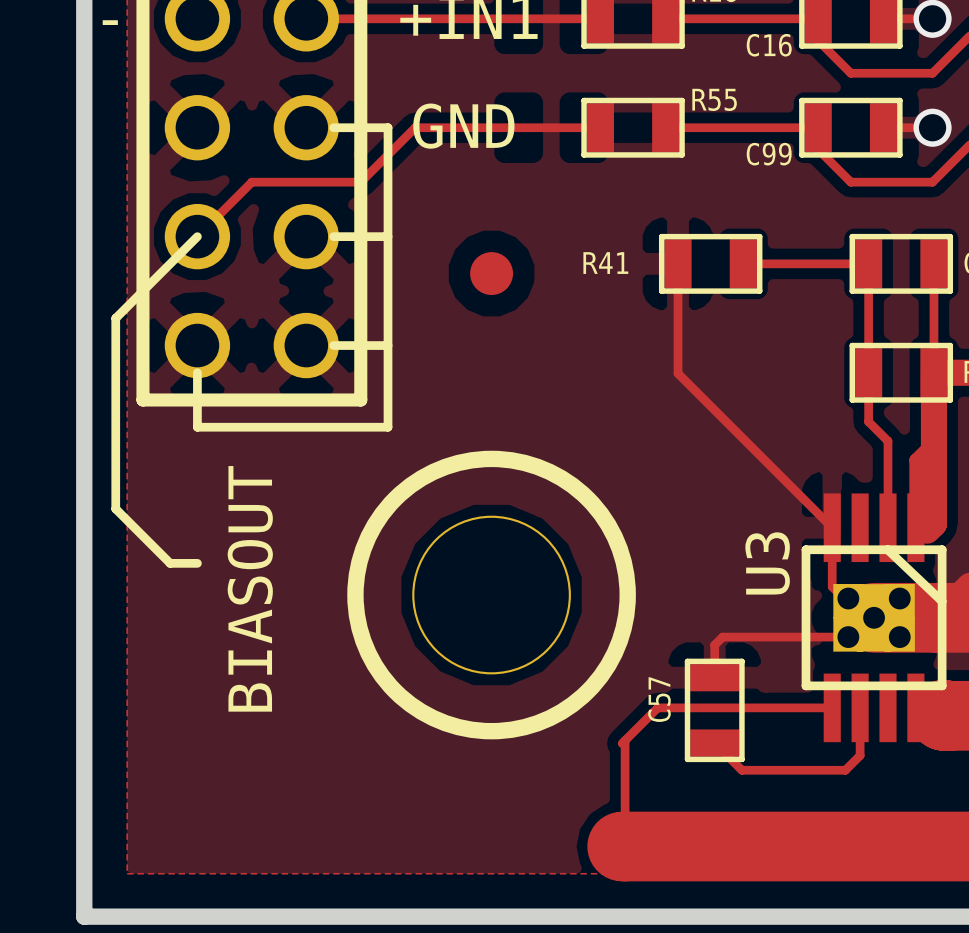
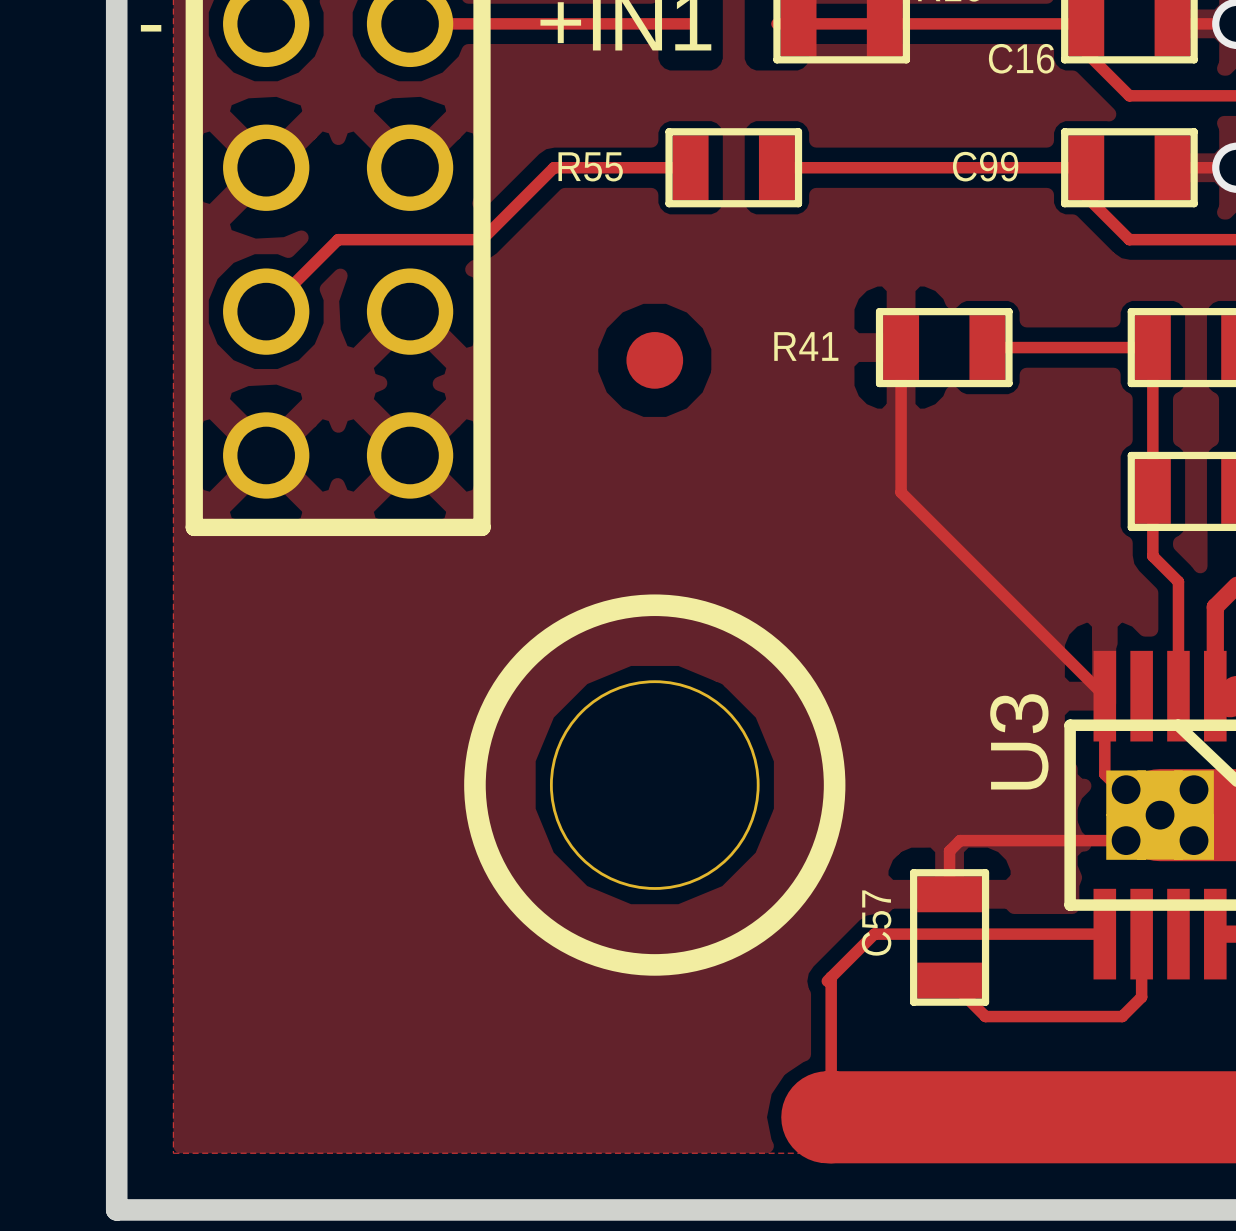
track: (518, 18) (584, 18) -> (798, 23) (884, 23)
R55 name position: R55 (714, 99) -> R55 (590, 166)
text: GND (463, 126) -> none
line: (333, 127) (388, 127) (388, 427) (197, 427) (197, 372) -> none
track: (518, 127) (584, 127) -> (798, 167) (884, 167)
R55 position: (633, 127) -> (733, 167)
C99 name position: C99 (769, 154) -> C99 (985, 166)
line: (197, 236) (115, 318) (115, 508) (170, 563) (197, 563) -> none
line: (333, 236) (388, 236) -> none
line: (333, 345) (388, 345) -> none
text: BIASOUT (250, 588) -> none

